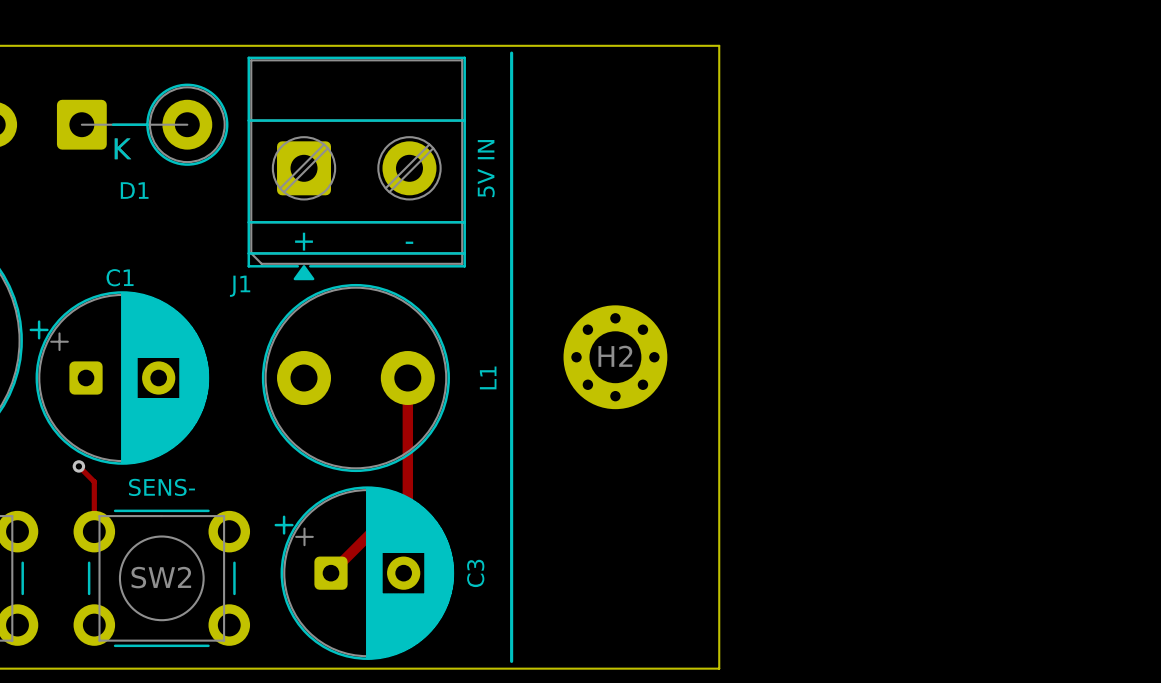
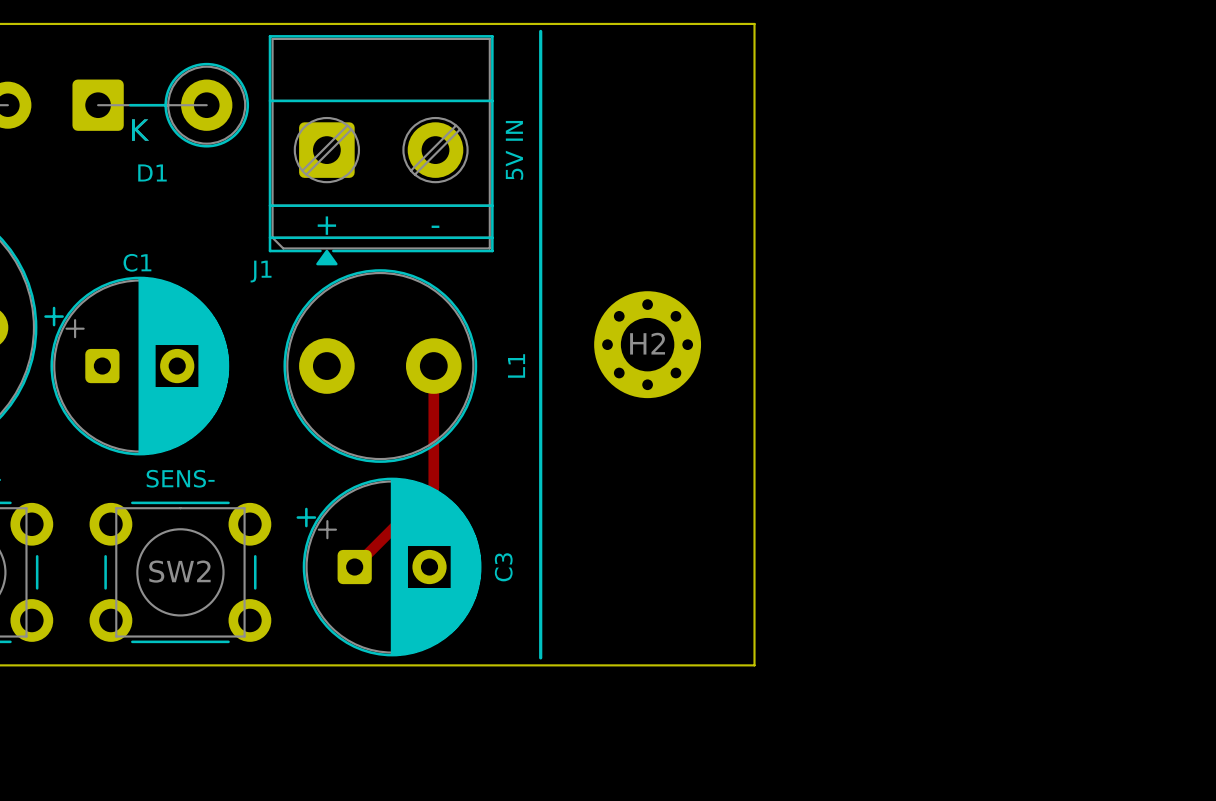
track: (78, 466) (94, 481) (94, 531) -> none
via: (78, 466) -> none

